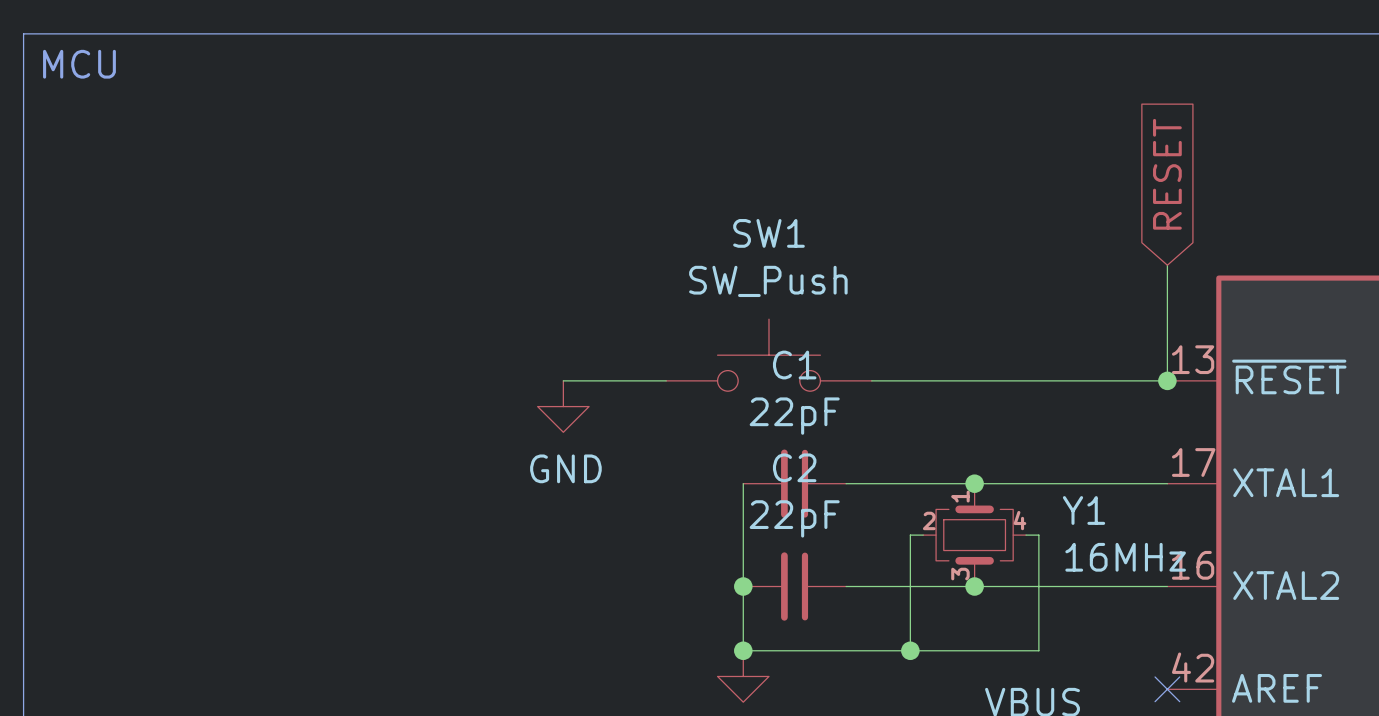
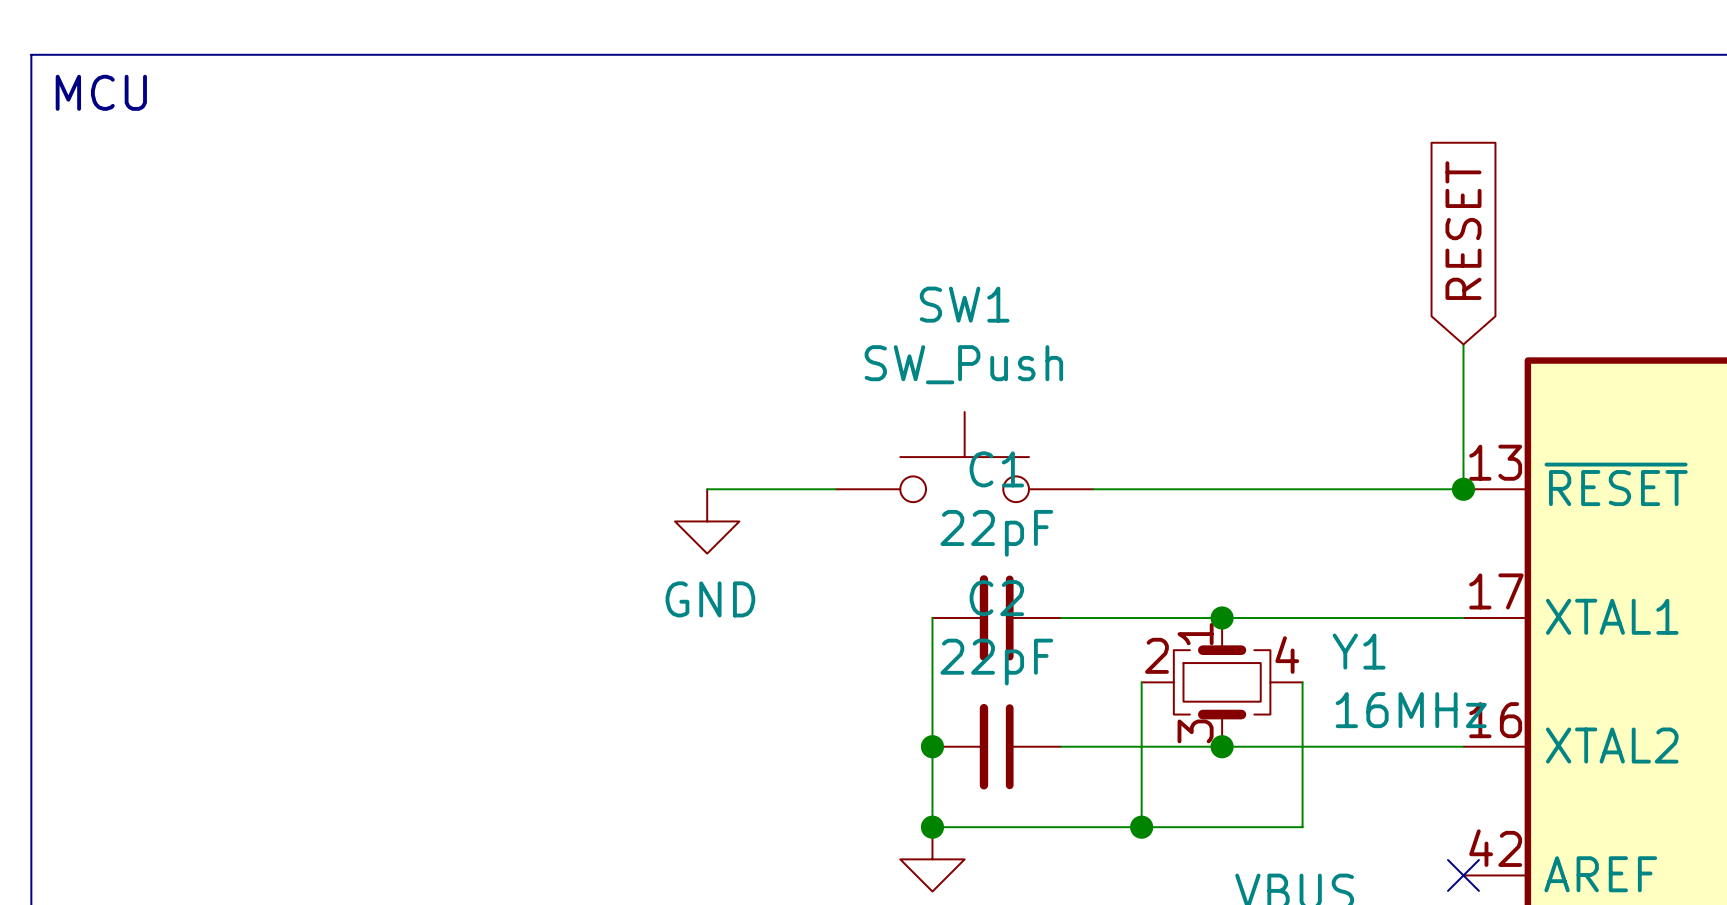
Y1 symbol: [923, 483, 1027, 587] -> [1141, 618, 1303, 747]

